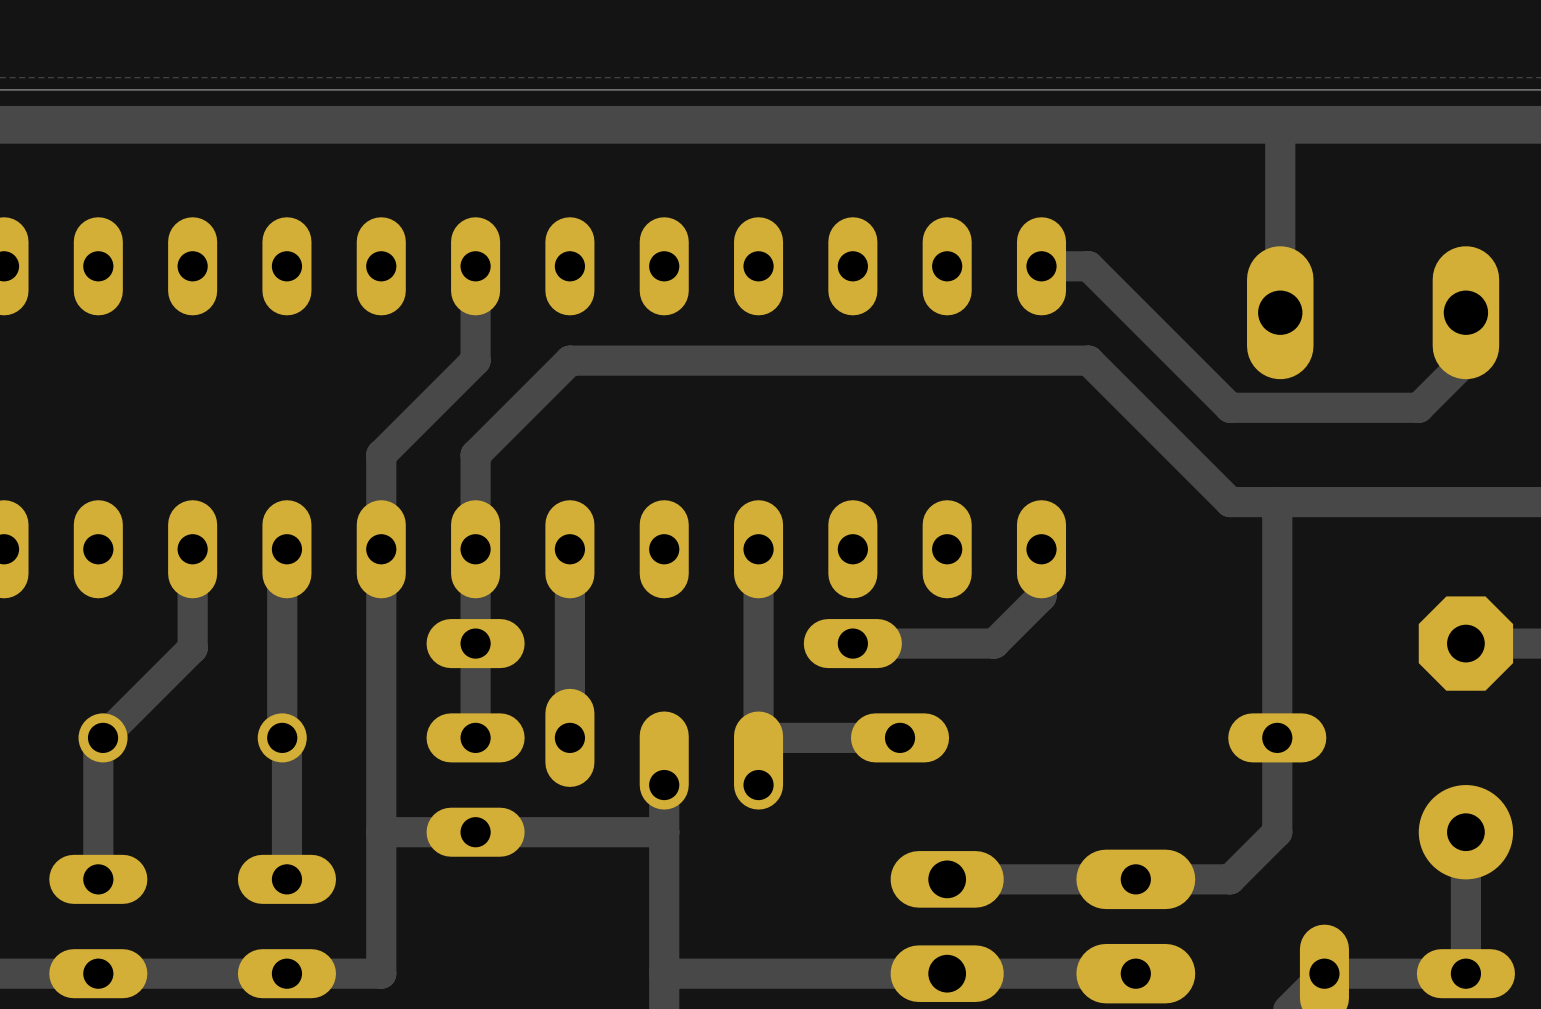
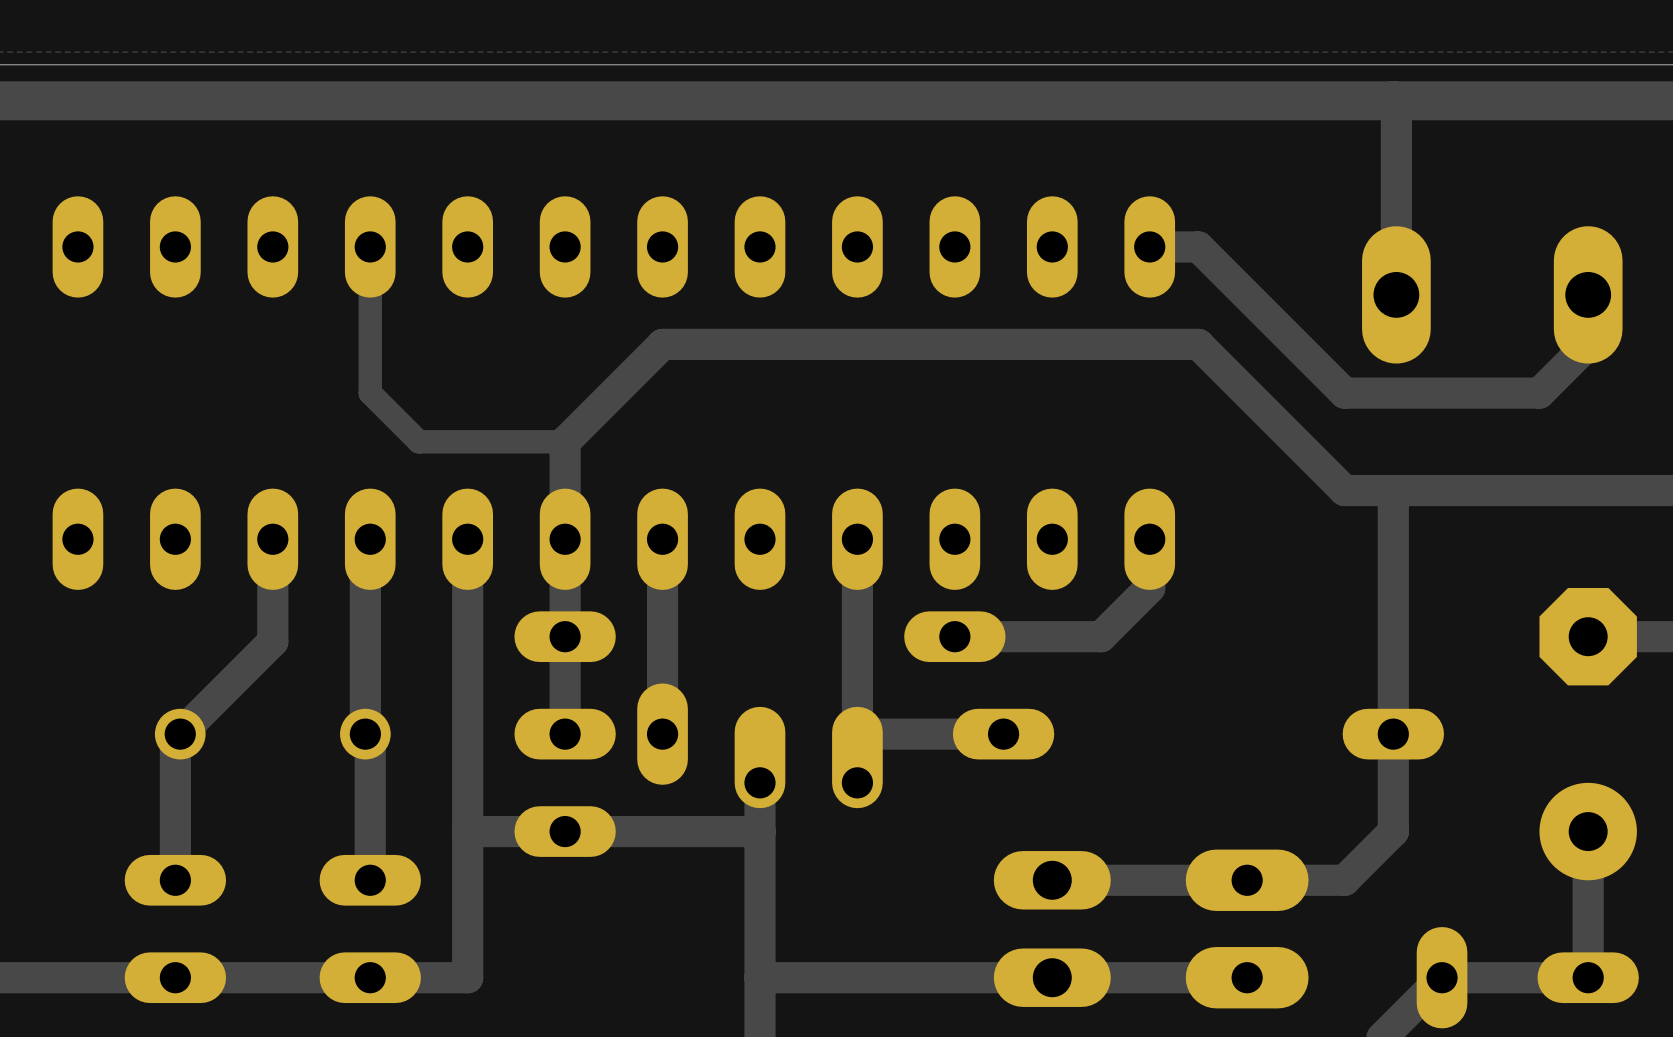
track: none -> (370, 246) (370, 393) (418, 441) (565, 441)
track: (475, 266) (475, 360) (381, 454) (381, 549) -> none

